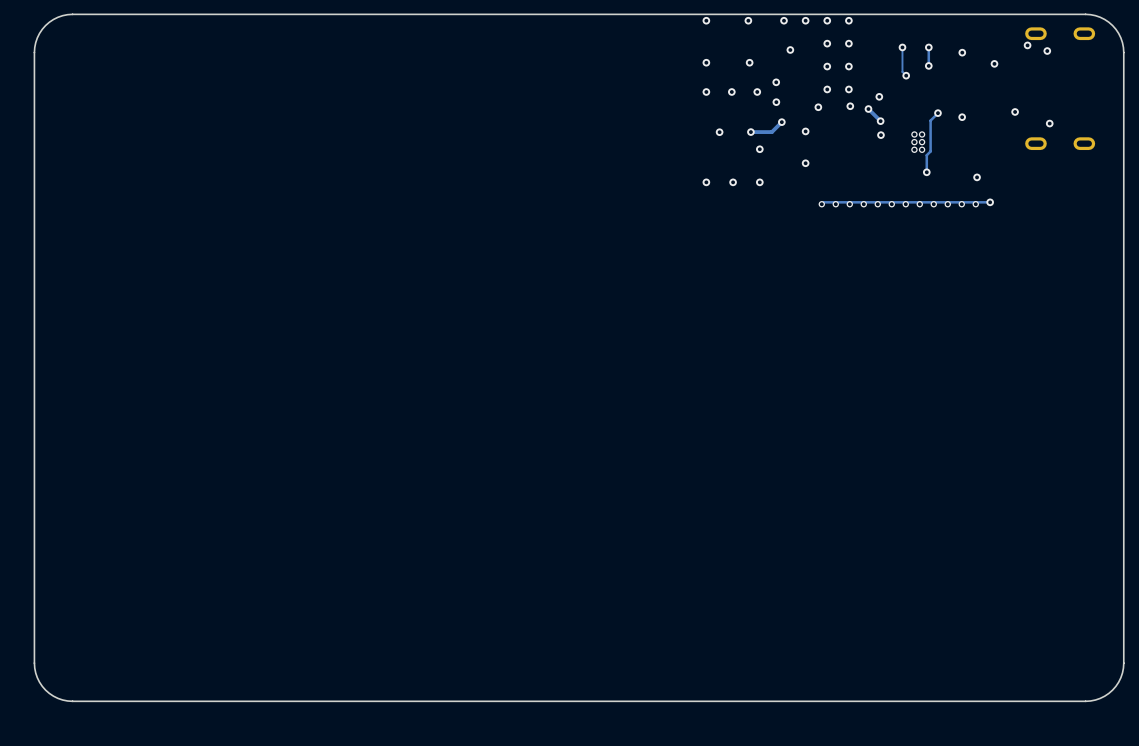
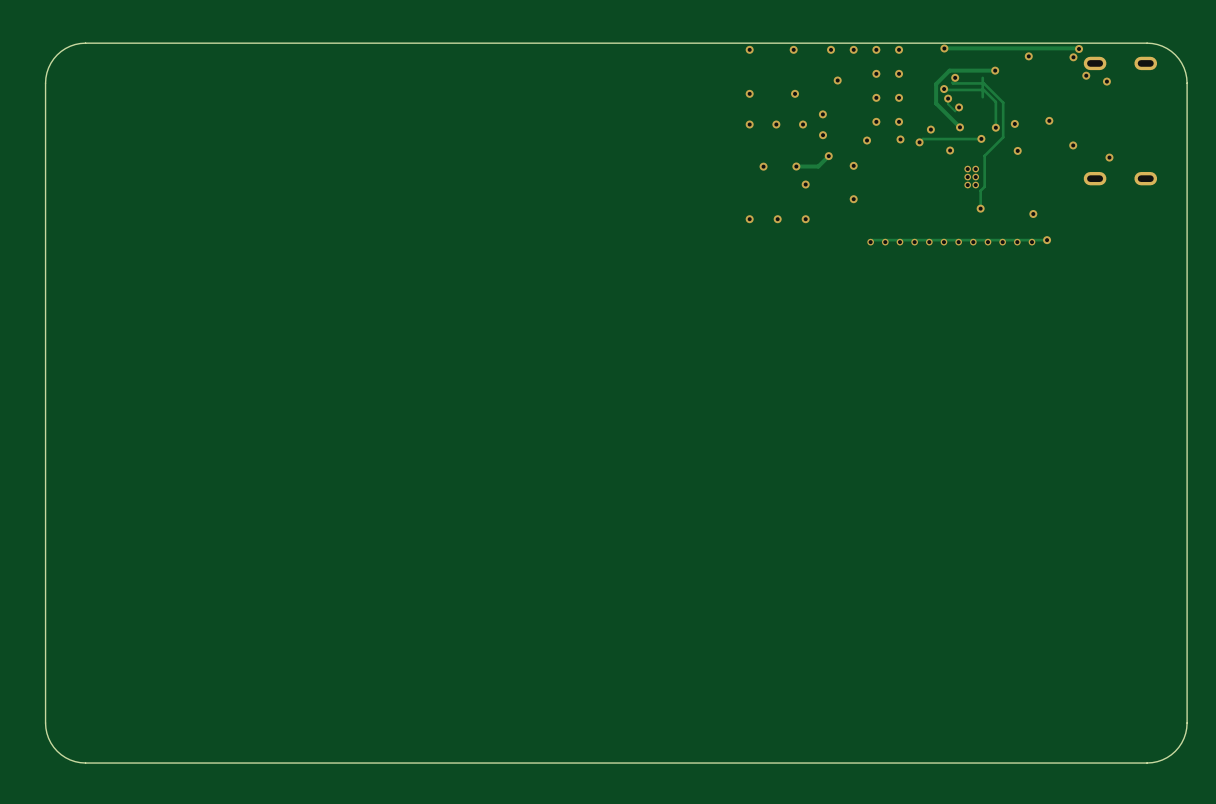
track: none -> (944, 48) (1079, 48)
via: none -> (944, 48)
via: none -> (1079, 48)
via: none -> (1028, 56)
via: none -> (1073, 57)
track: none -> (995, 70) (949, 70) (936, 84) (936, 103) (960, 127)
via: none -> (995, 70)
track: (902, 47) (902, 72) (906, 75) -> none
via: (928, 47) -> none
via: (962, 52) -> none
track: none -> (944, 89) (983, 89) (995, 101) (995, 127)
via: none -> (944, 89)
via: (994, 63) -> none
via: (928, 65) -> none
track: none -> (948, 98) (948, 104) (955, 111)
via: none -> (948, 98)
via: none -> (1049, 120)
via: none -> (1014, 123)
via: none -> (960, 127)
via: none -> (995, 127)
track: none -> (981, 139) (922, 139)
via: none -> (981, 138)
track: (868, 109) (880, 121) -> none
track: (937, 113) (930, 121) -> (952, 82) (983, 83) (1003, 102) (1003, 137) (984, 155)
via: (937, 113) -> none
via: none -> (950, 150)
via: (880, 121) -> none
via: (880, 135) -> none

